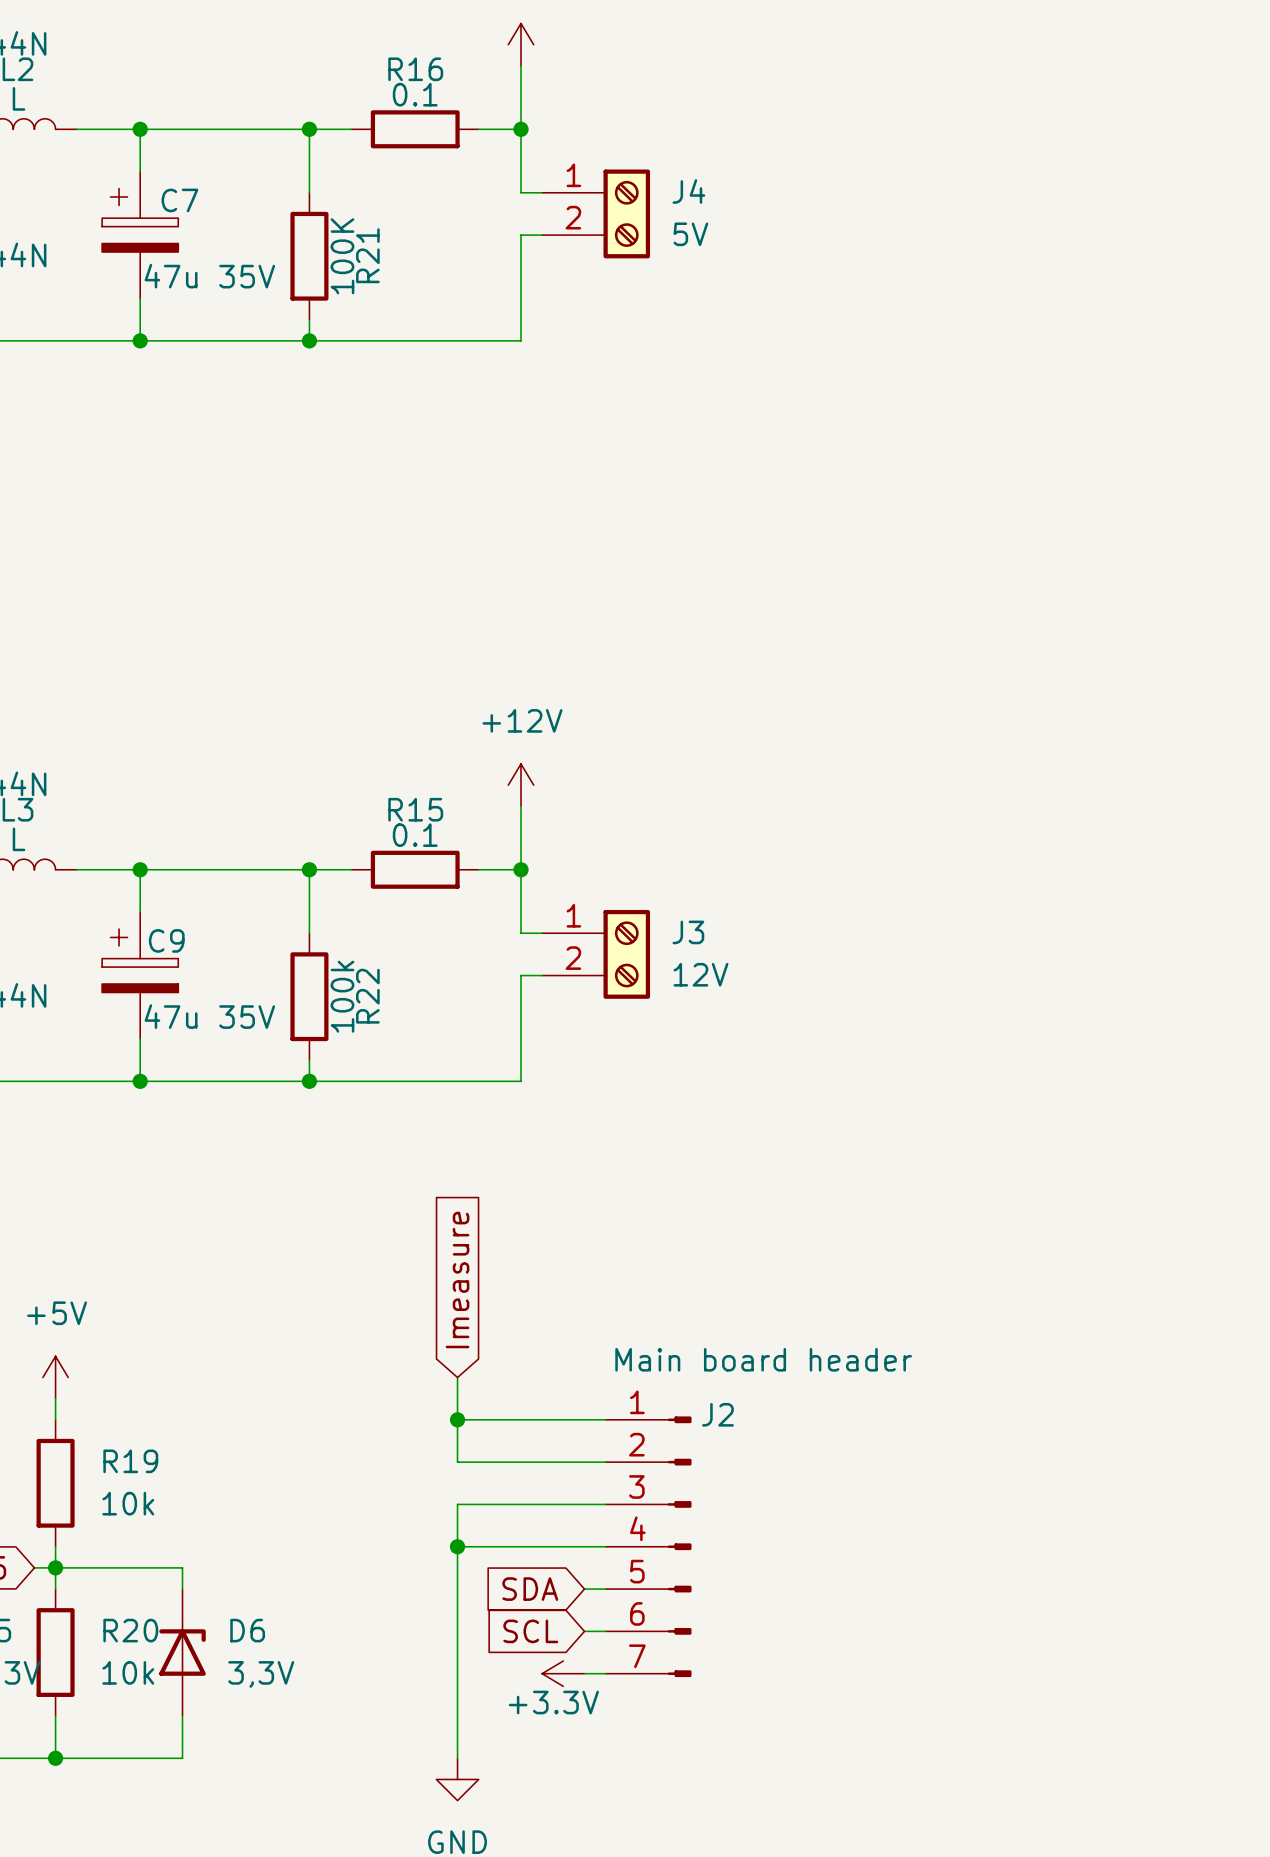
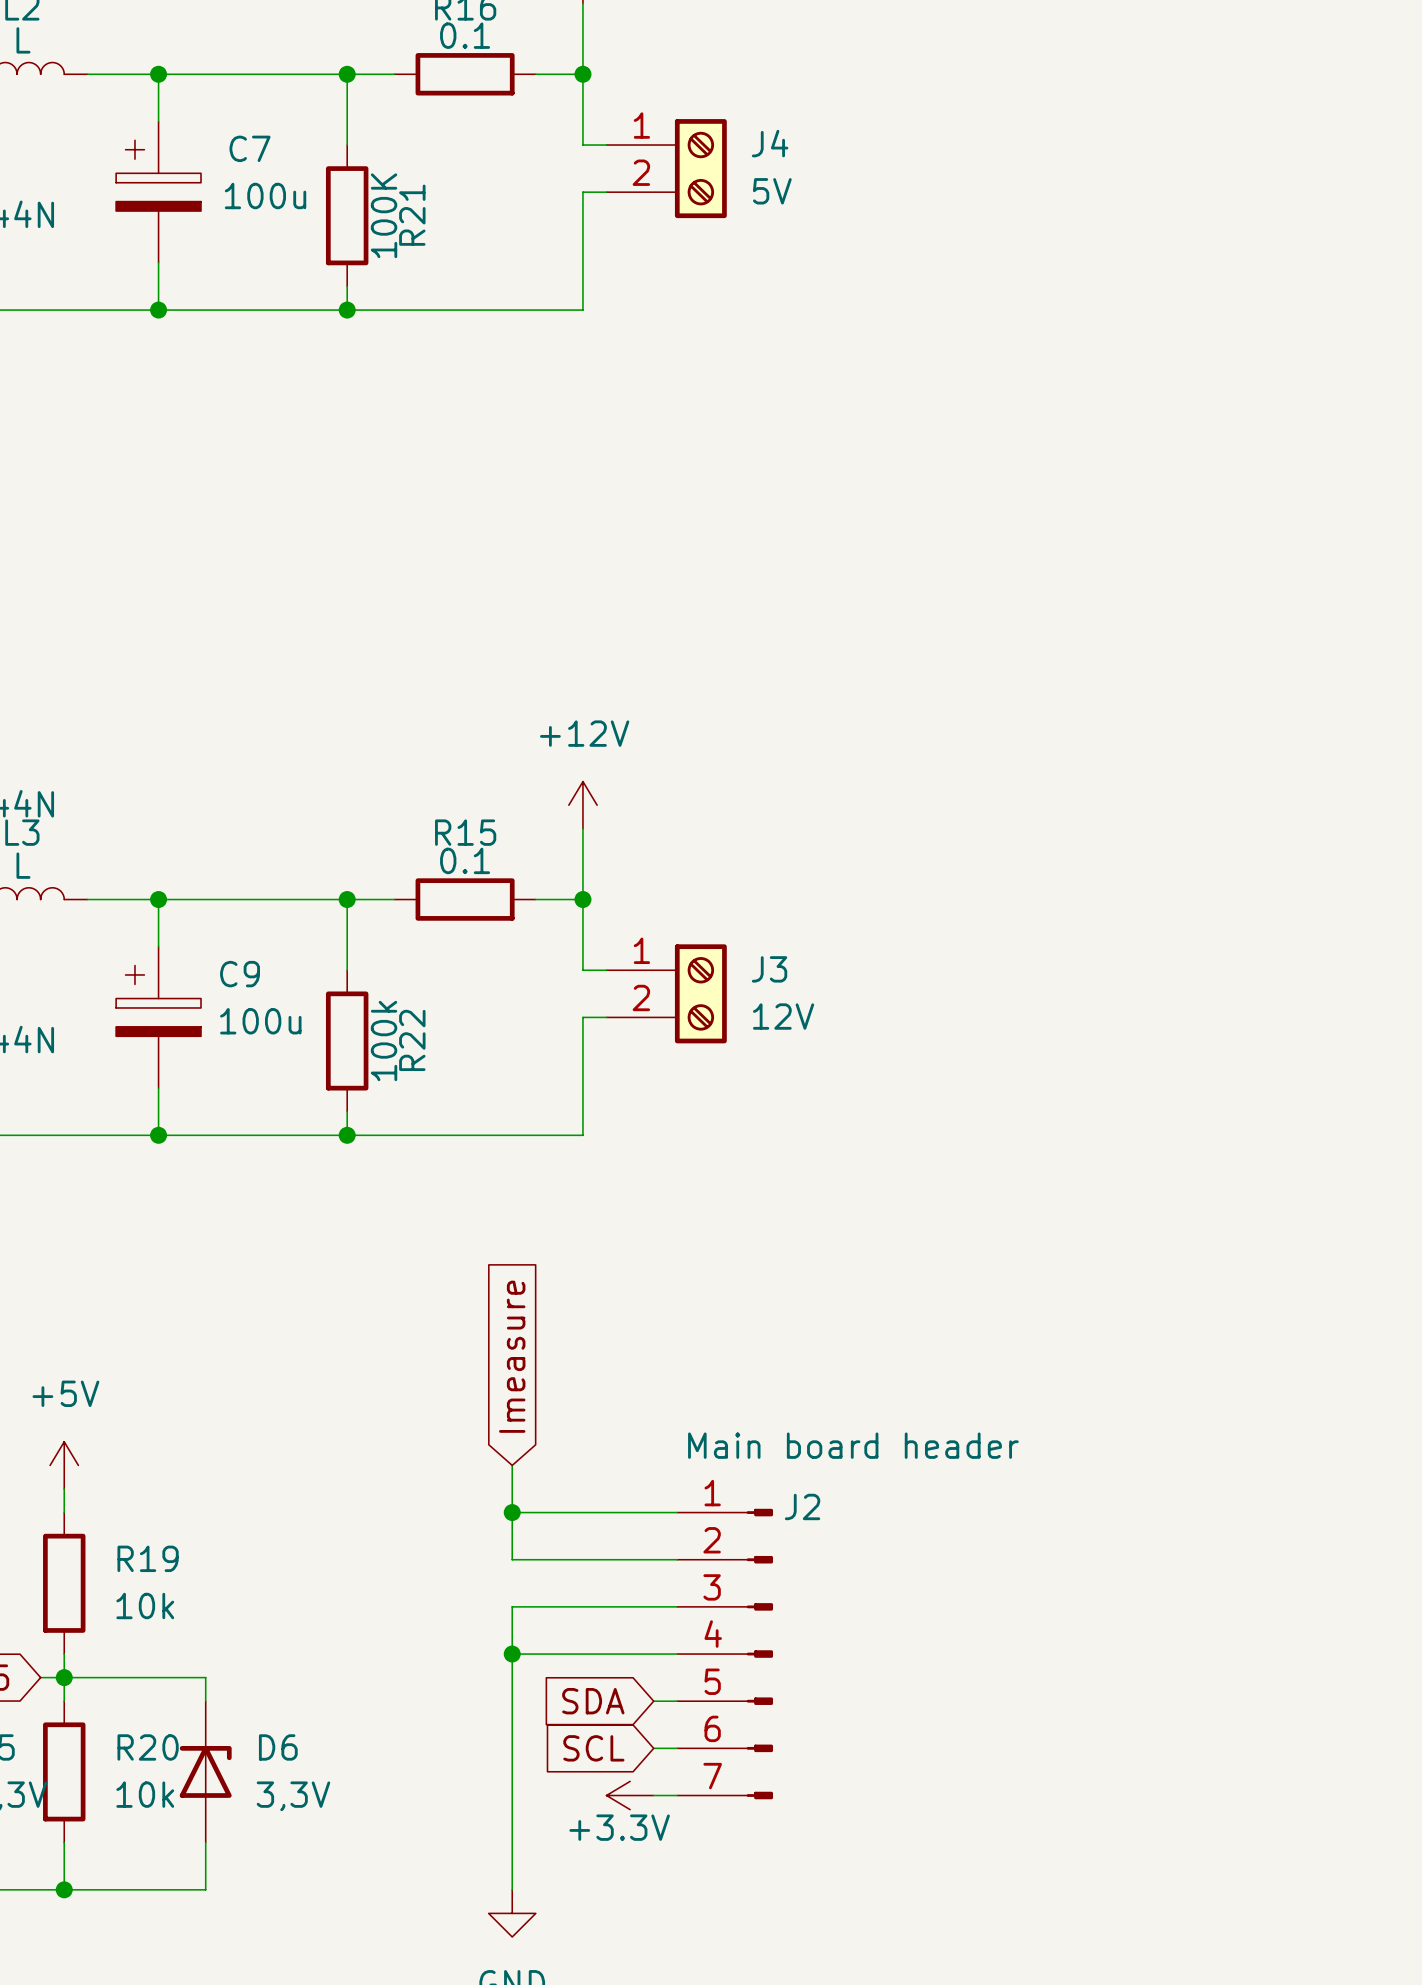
C7 name position: C7 (179, 200) -> C7 (250, 148)
C7 value: 47u 35V (209, 276) -> 100u (265, 196)
C9 name position: C9 (166, 940) -> C9 (240, 974)
C9 value: 47u 35V (209, 1016) -> 100u (260, 1021)

